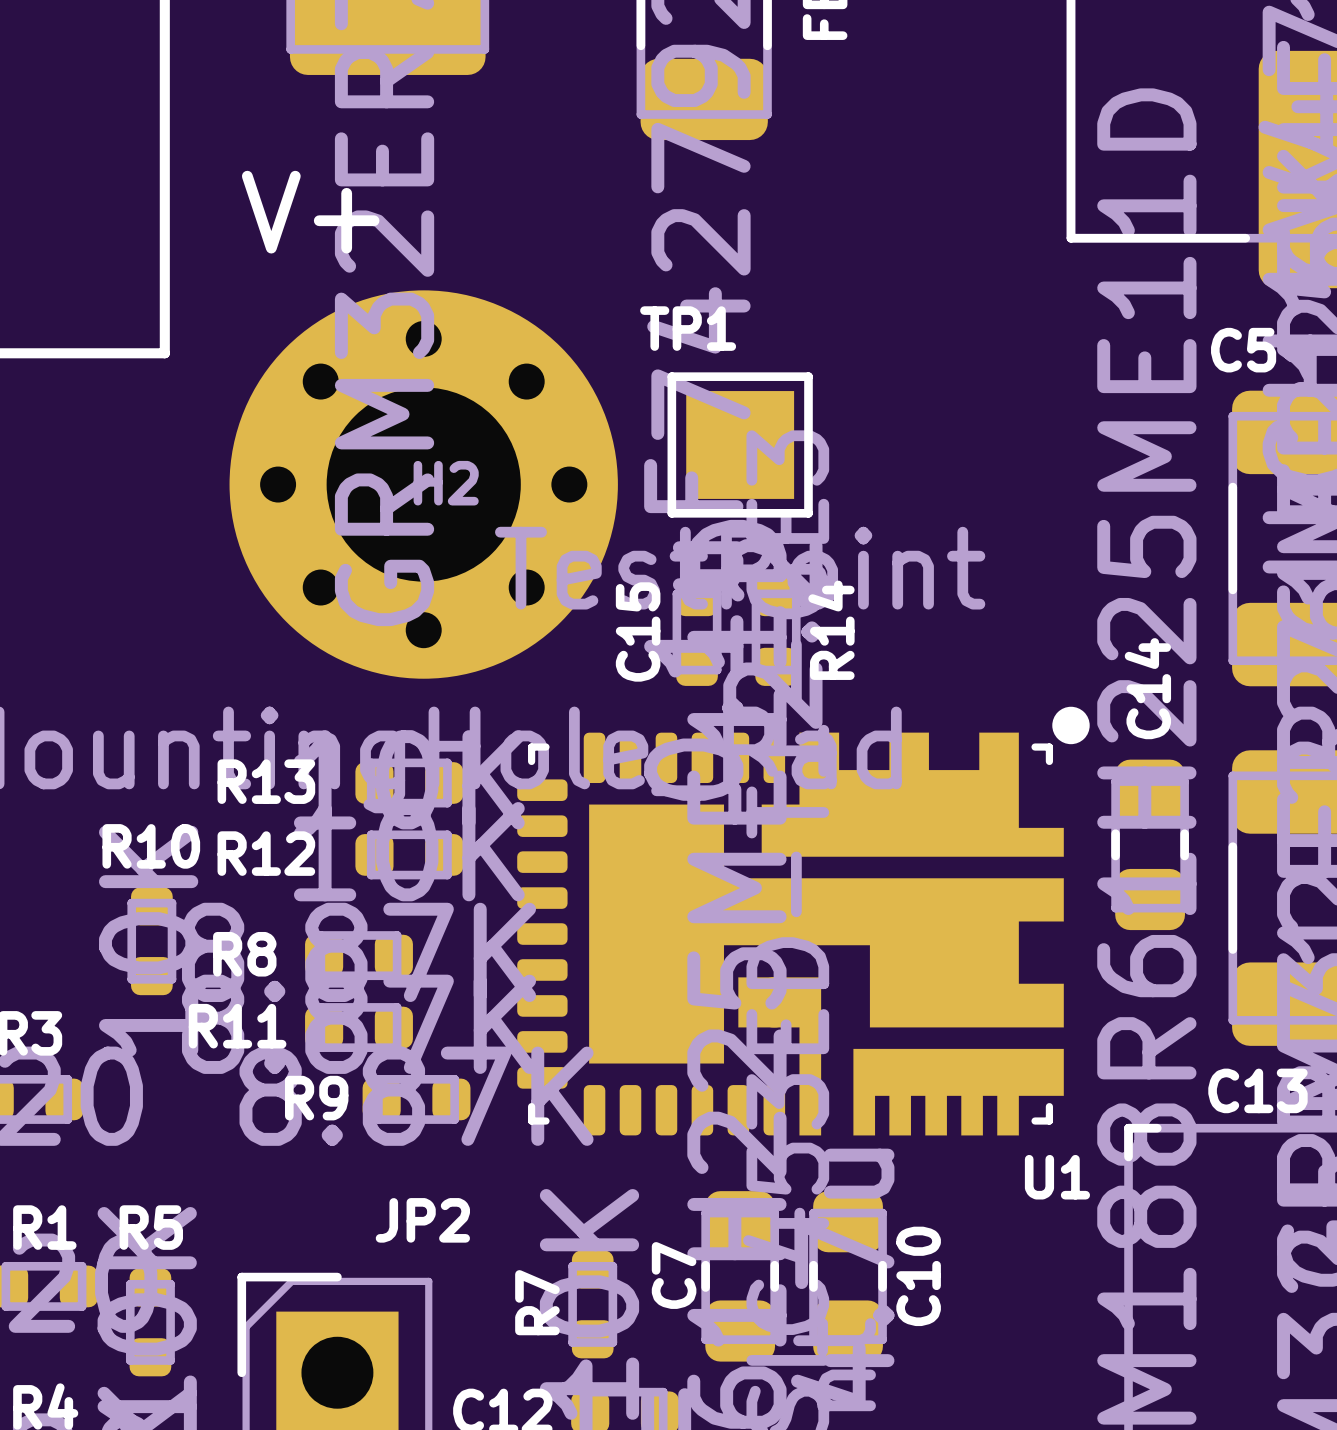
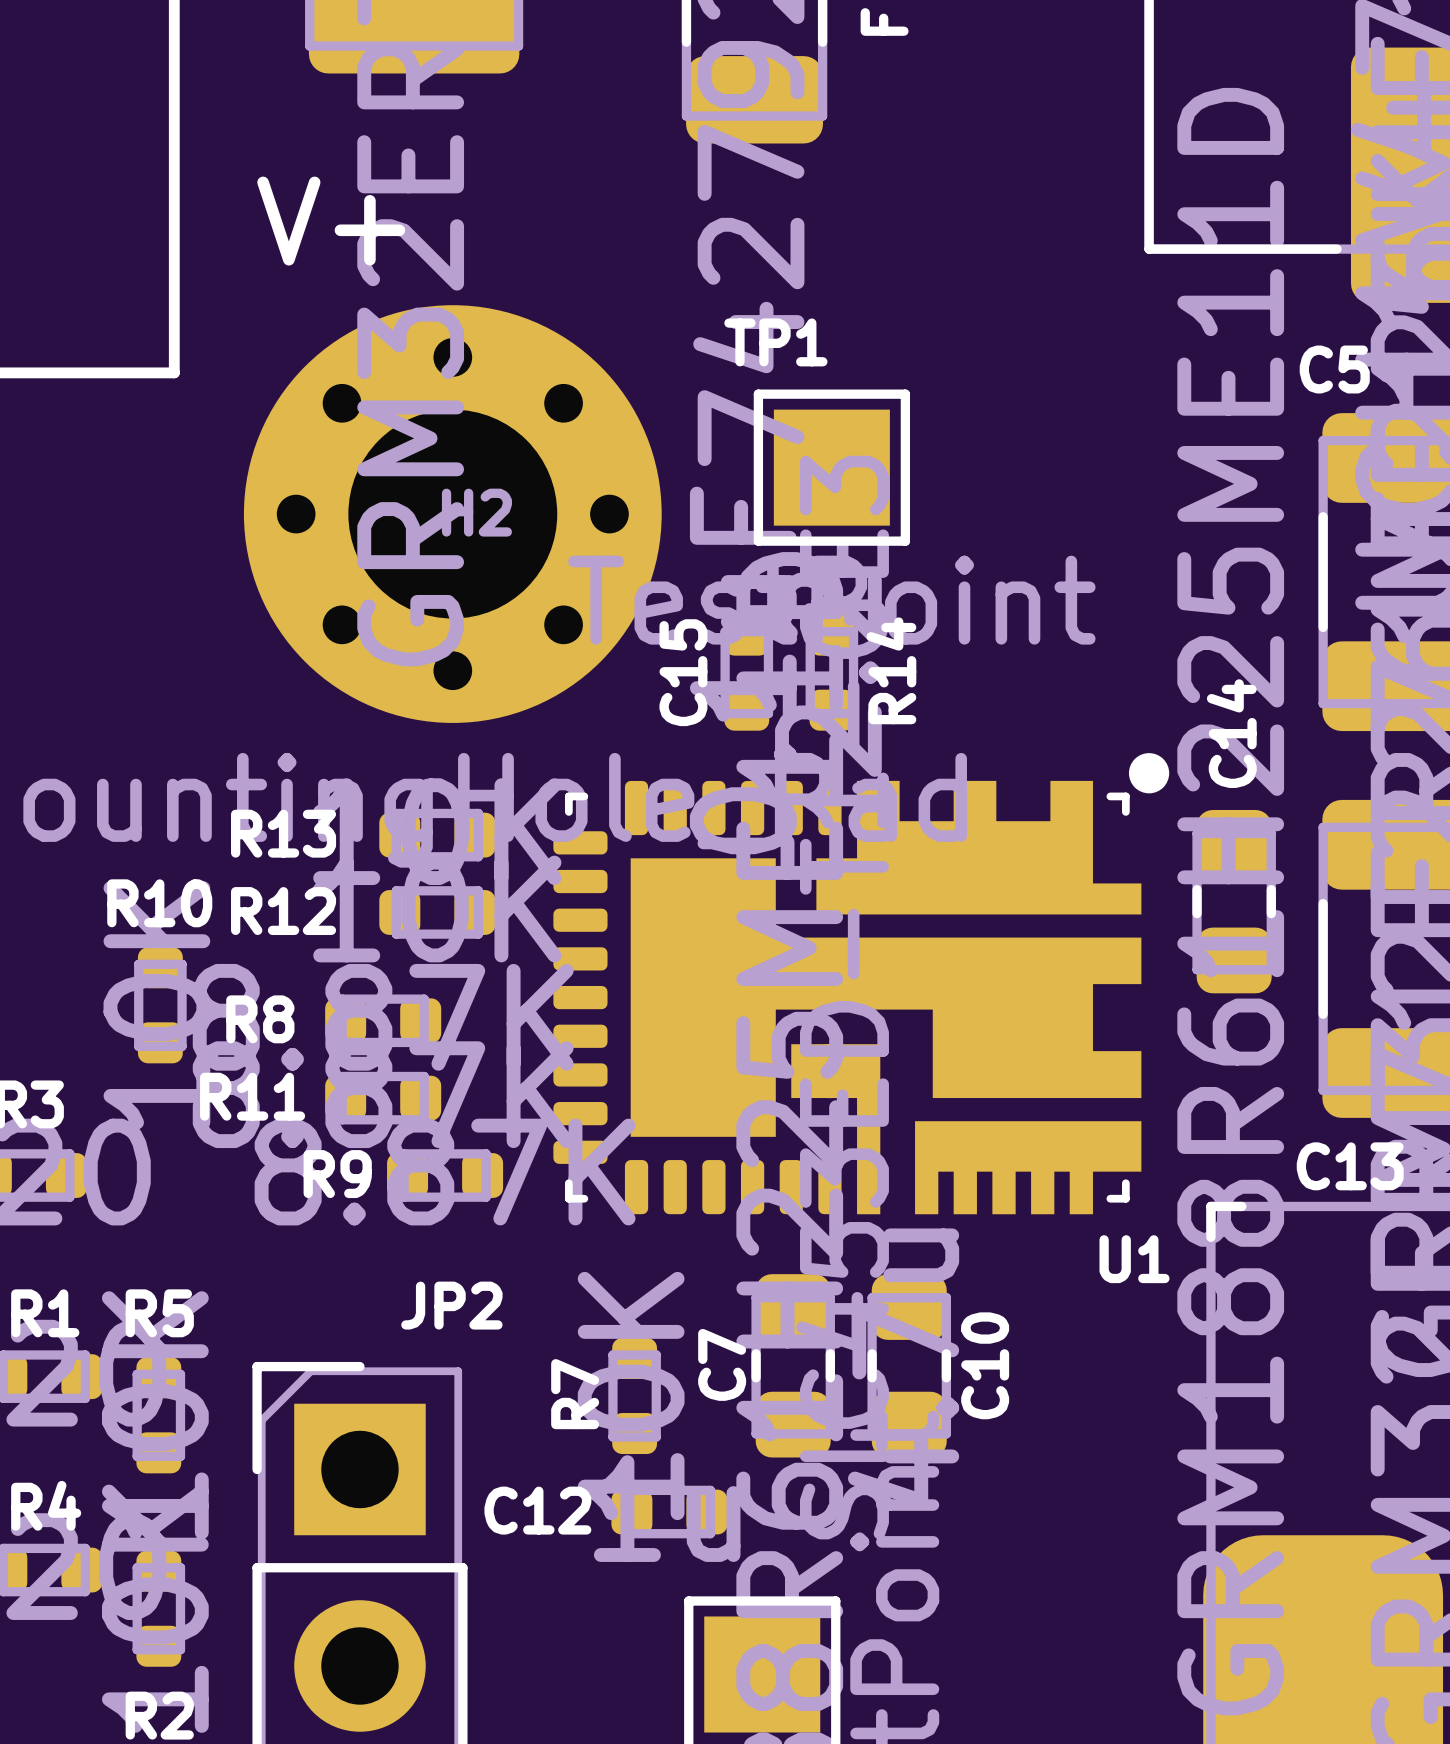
TP1 position: (740, 444) -> (831, 467)

